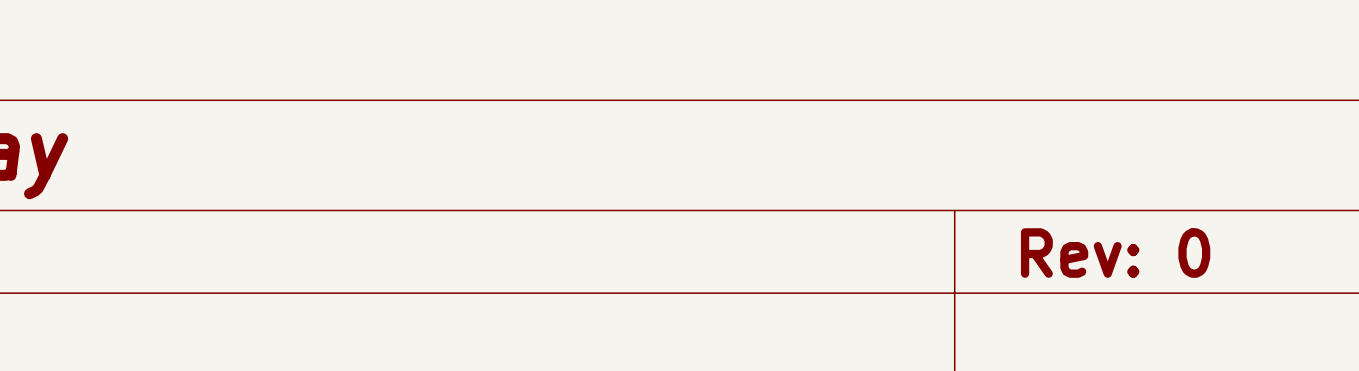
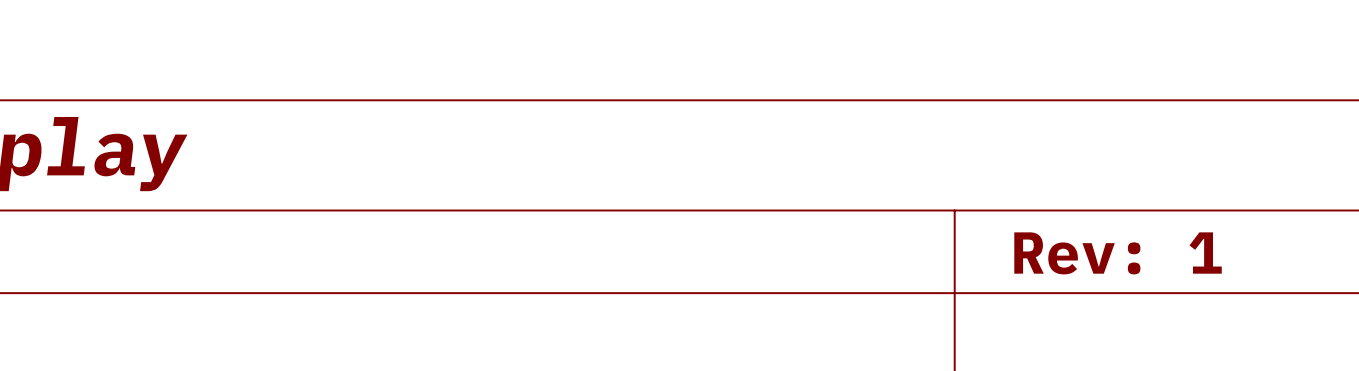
title block: Rev: 0 (1115, 253) -> Rev: 1 (1118, 253)

